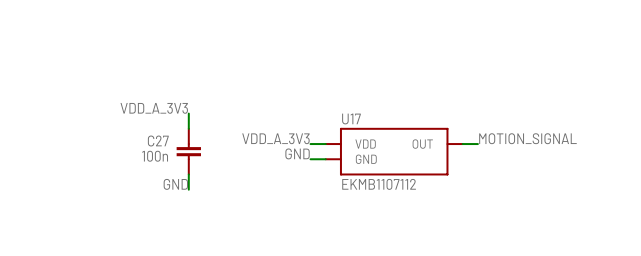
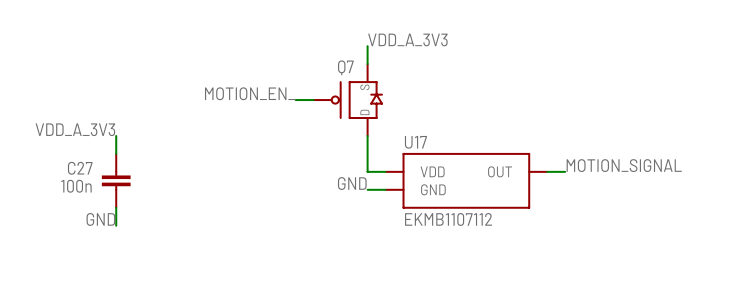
label: none -> VDD_A_3V3 (407, 39)
wire: none -> (367, 46) (367, 64)
label: none -> MOTION_EN_ (250, 93)
wire: none -> (295, 100) (313, 100)
Q7: none -> (348, 100)
label: none -> VDD_A_3V3 (75, 129)
label: VDD_A_3V3 (154, 108) -> none
wire: (188, 113) (188, 128) -> (116, 135) (116, 153)
wire: none -> (367, 135) (367, 171)
label: VDD_A_3V3 (275, 138) -> none
C27 position: (188, 151) -> (116, 180)
wire: (188, 174) (188, 189) -> (116, 207) (116, 225)
label position: GND (175, 184) -> GND (100, 219)

